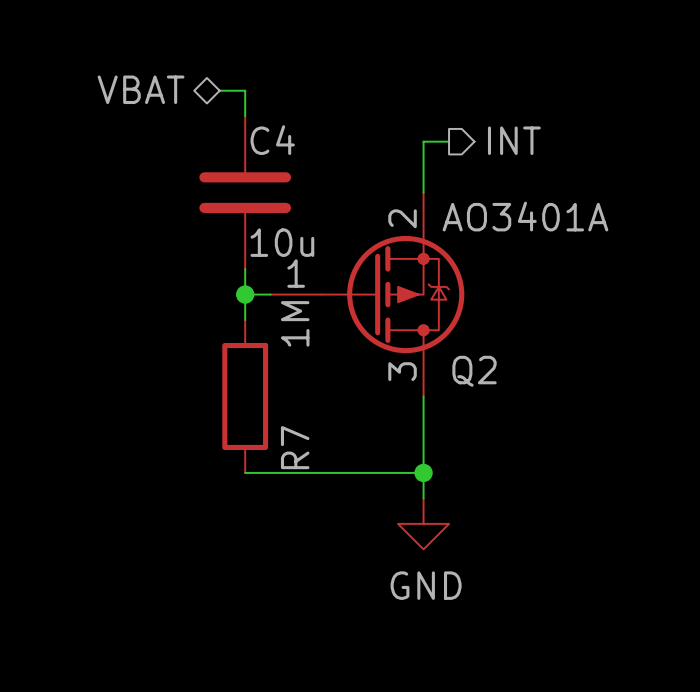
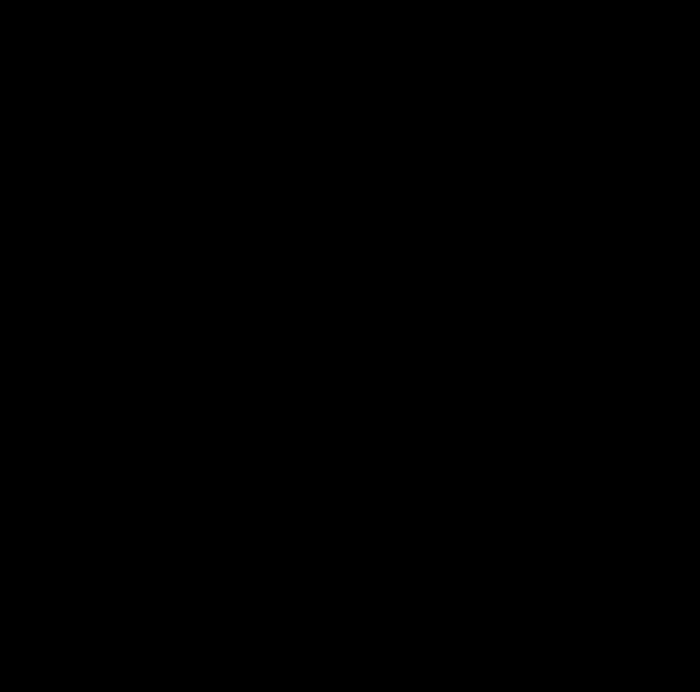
hierarchical label: VBAT (141, 89) -> none
wire: (219, 90) (245, 90) (245, 116) -> none
hierarchical label: INT (514, 140) -> none
wire: (449, 141) (423, 141) (423, 192) -> none
C4: 10u (245, 192) -> none
wire: (245, 269) (245, 320) -> none
wire: (245, 294) (270, 294) -> none
junction: (245, 294) -> none
Q2: AO3401A (367, 294) -> none
R7: 1M (245, 396) -> none
wire: (423, 396) (423, 498) -> none
wire: (245, 472) (423, 472) -> none
junction: (423, 472) -> none
power symbol: GND (423, 523) -> none

